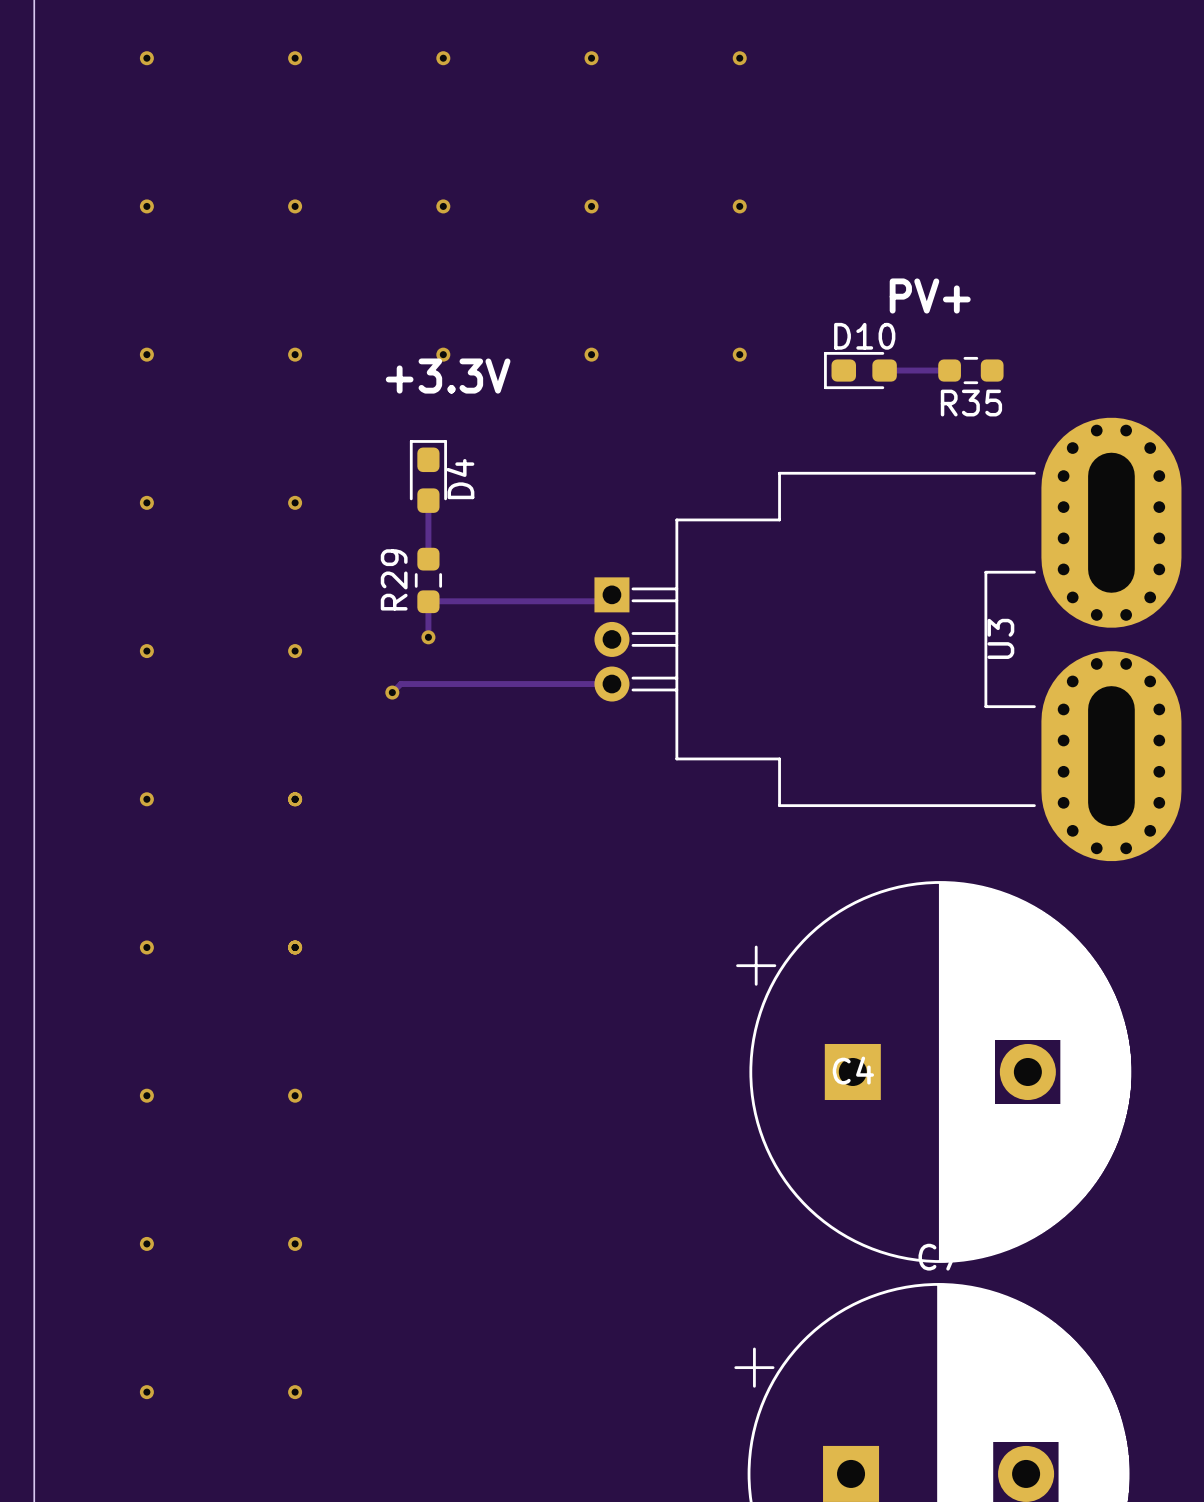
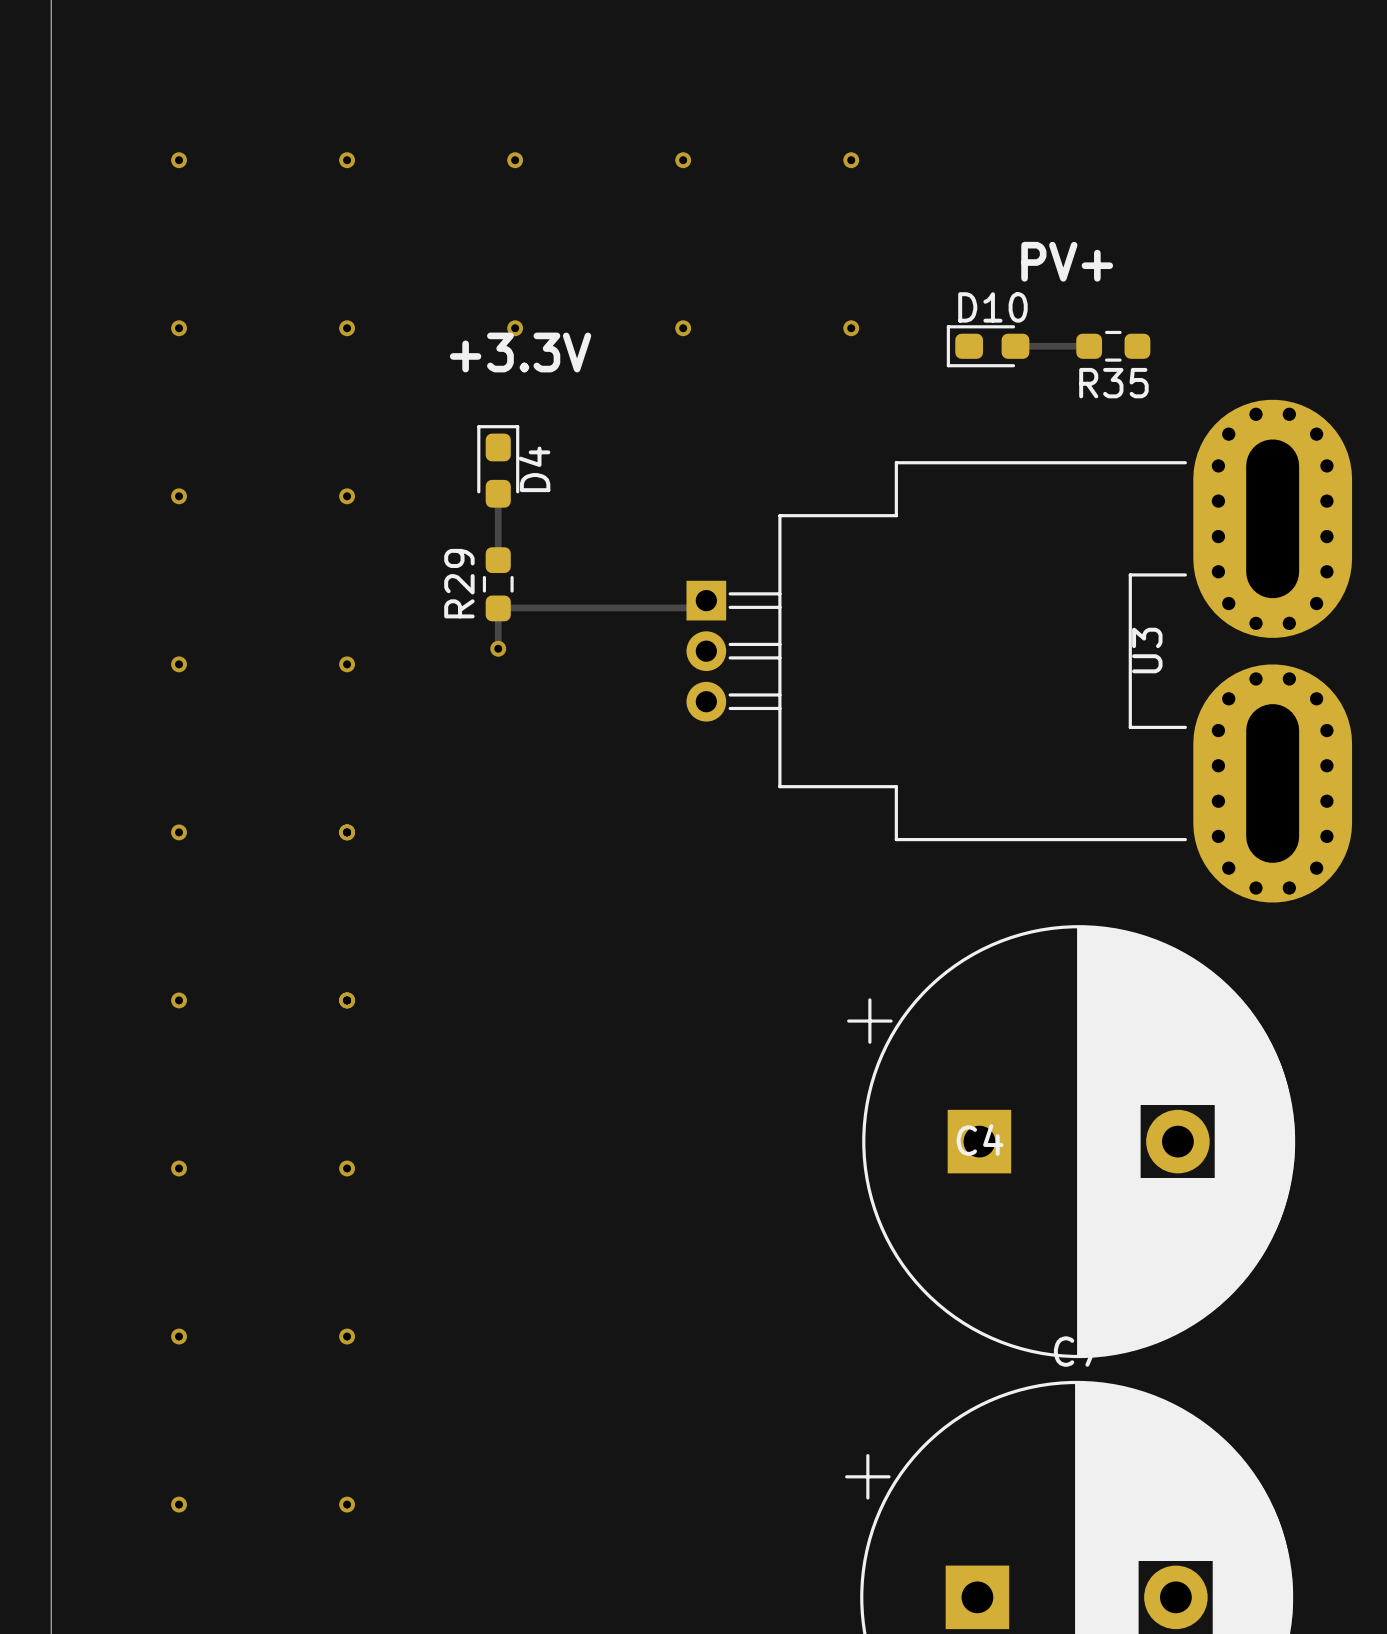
track: (611, 684) (400, 684) (392, 692) -> none
via: (392, 692) -> none

